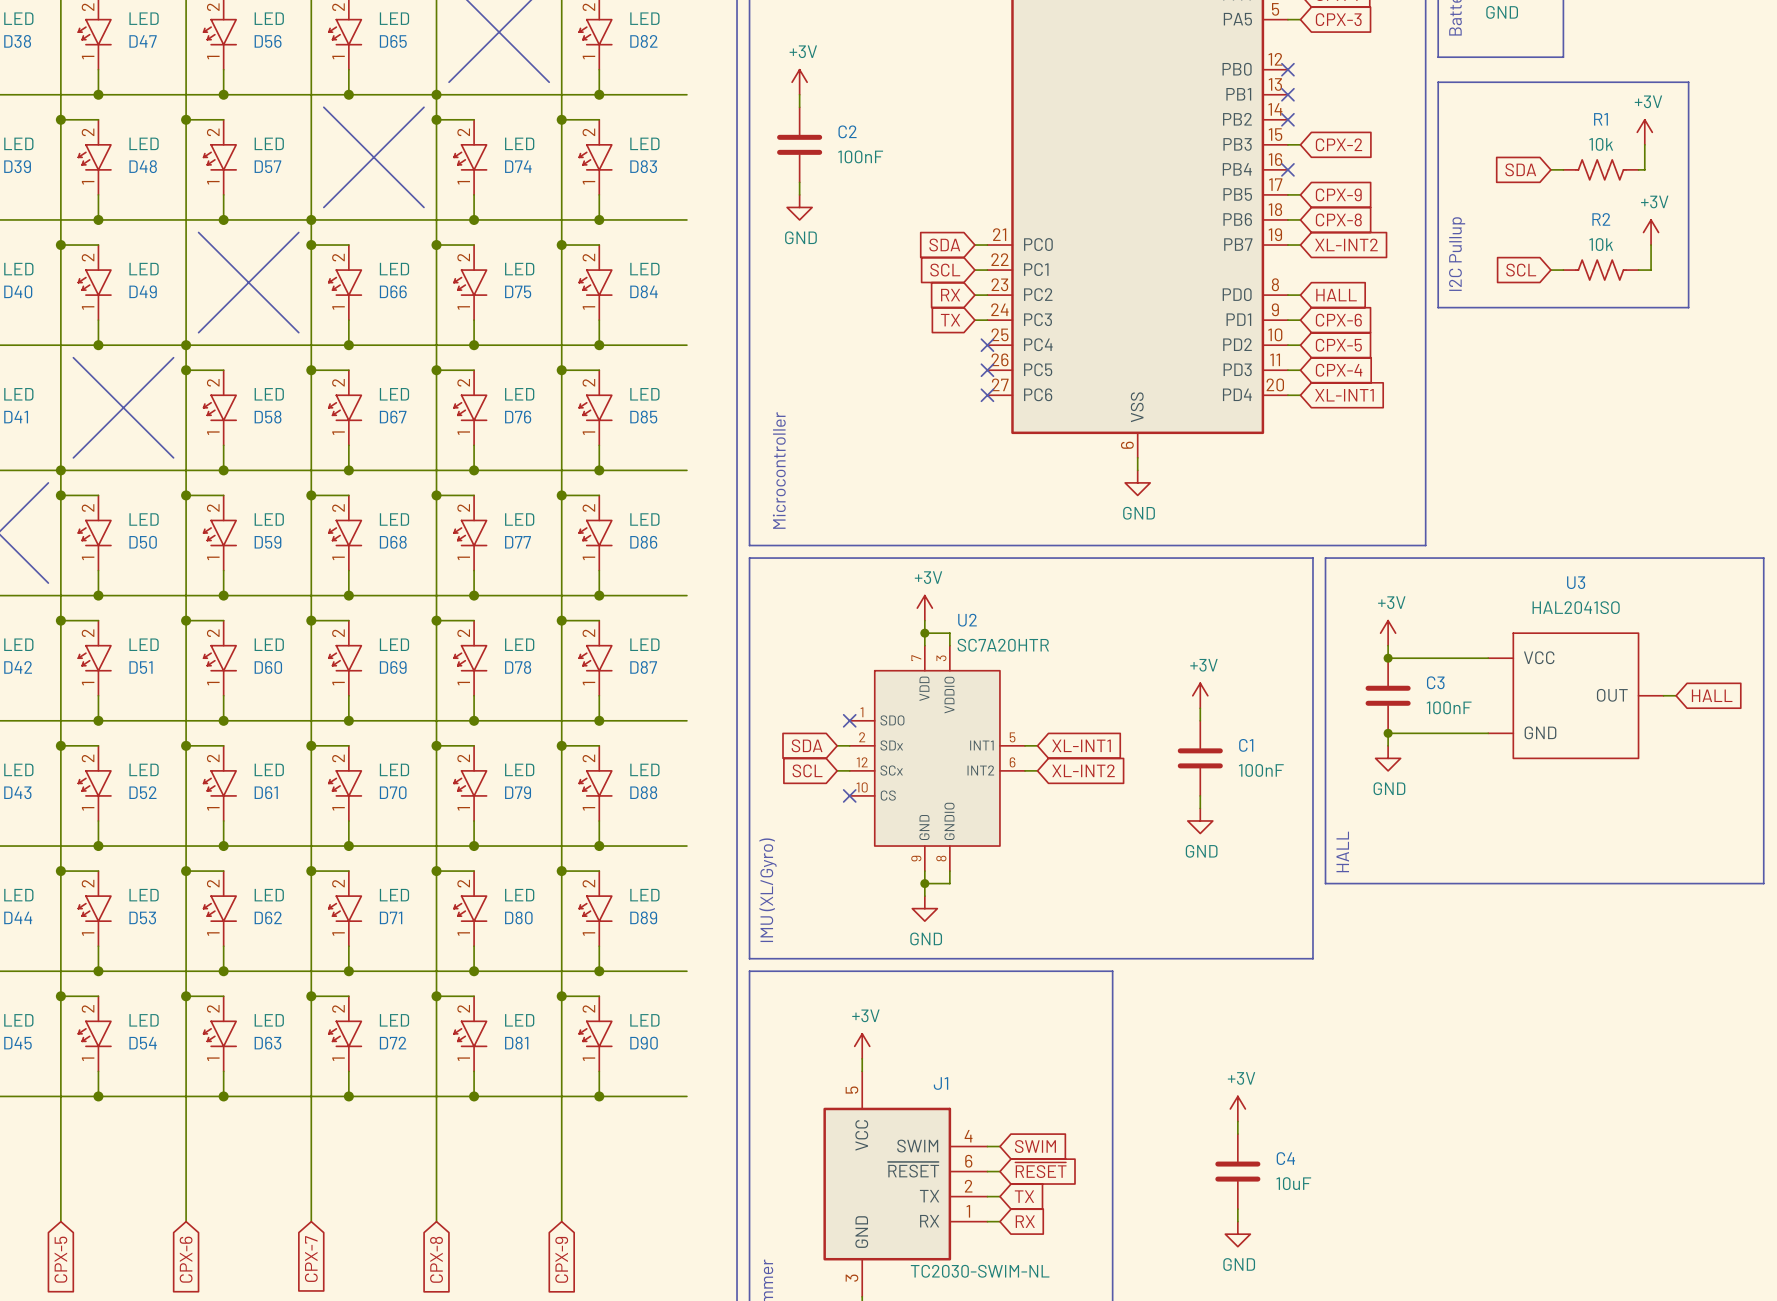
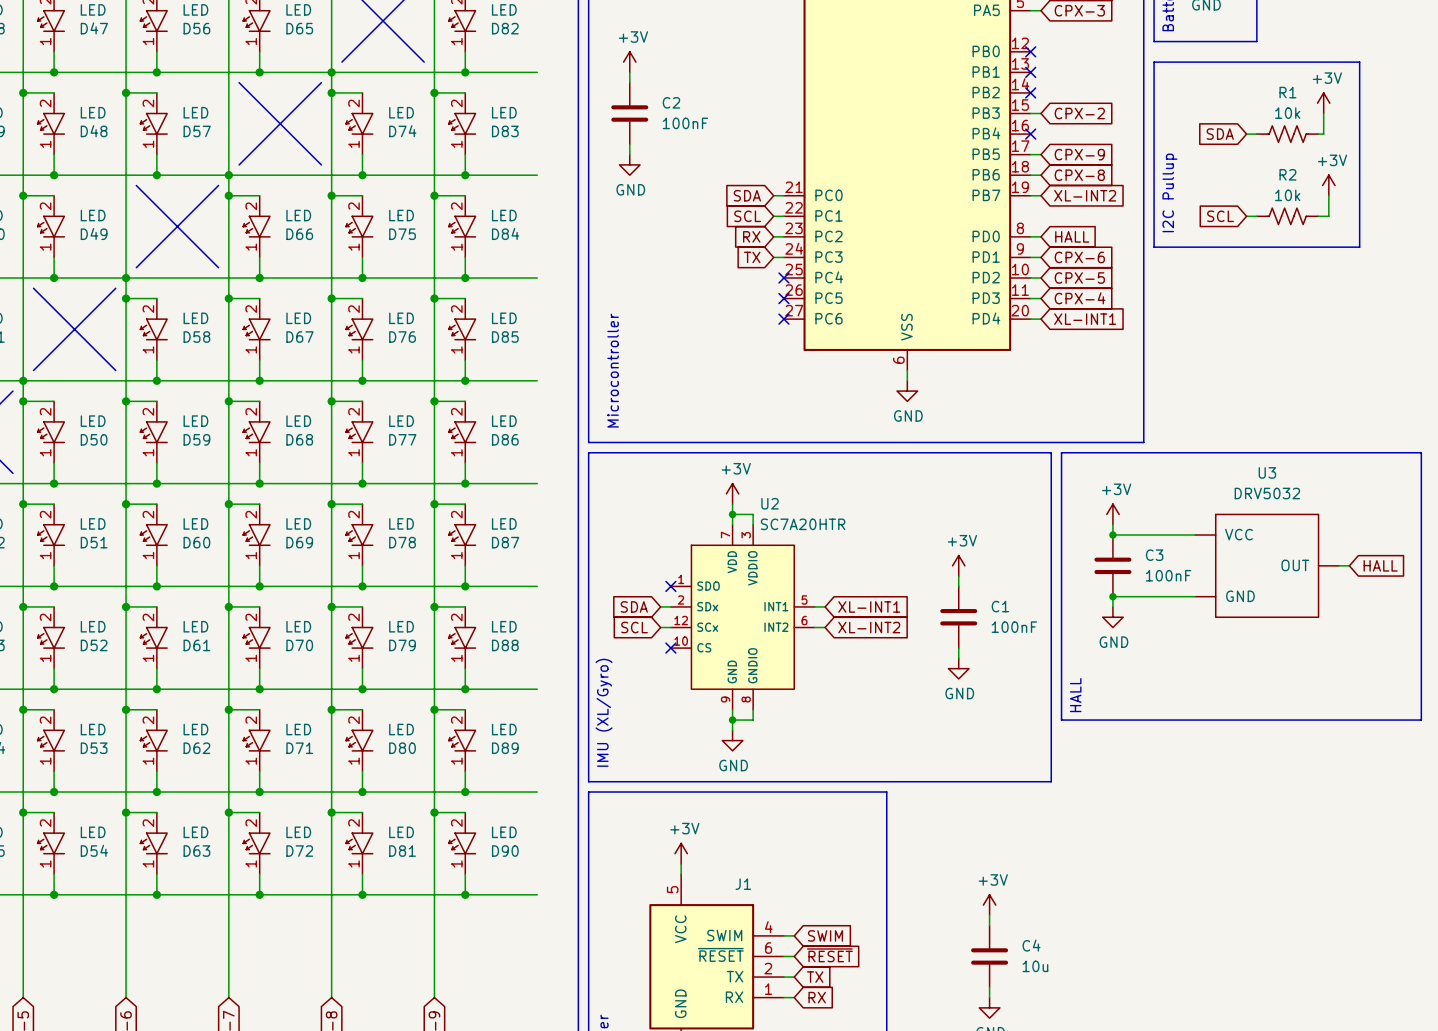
U3 value: HAL2041SO (1576, 607) -> DRV5032 (1267, 493)
C4 value: 10uF (1293, 1183) -> 10u (1035, 966)

